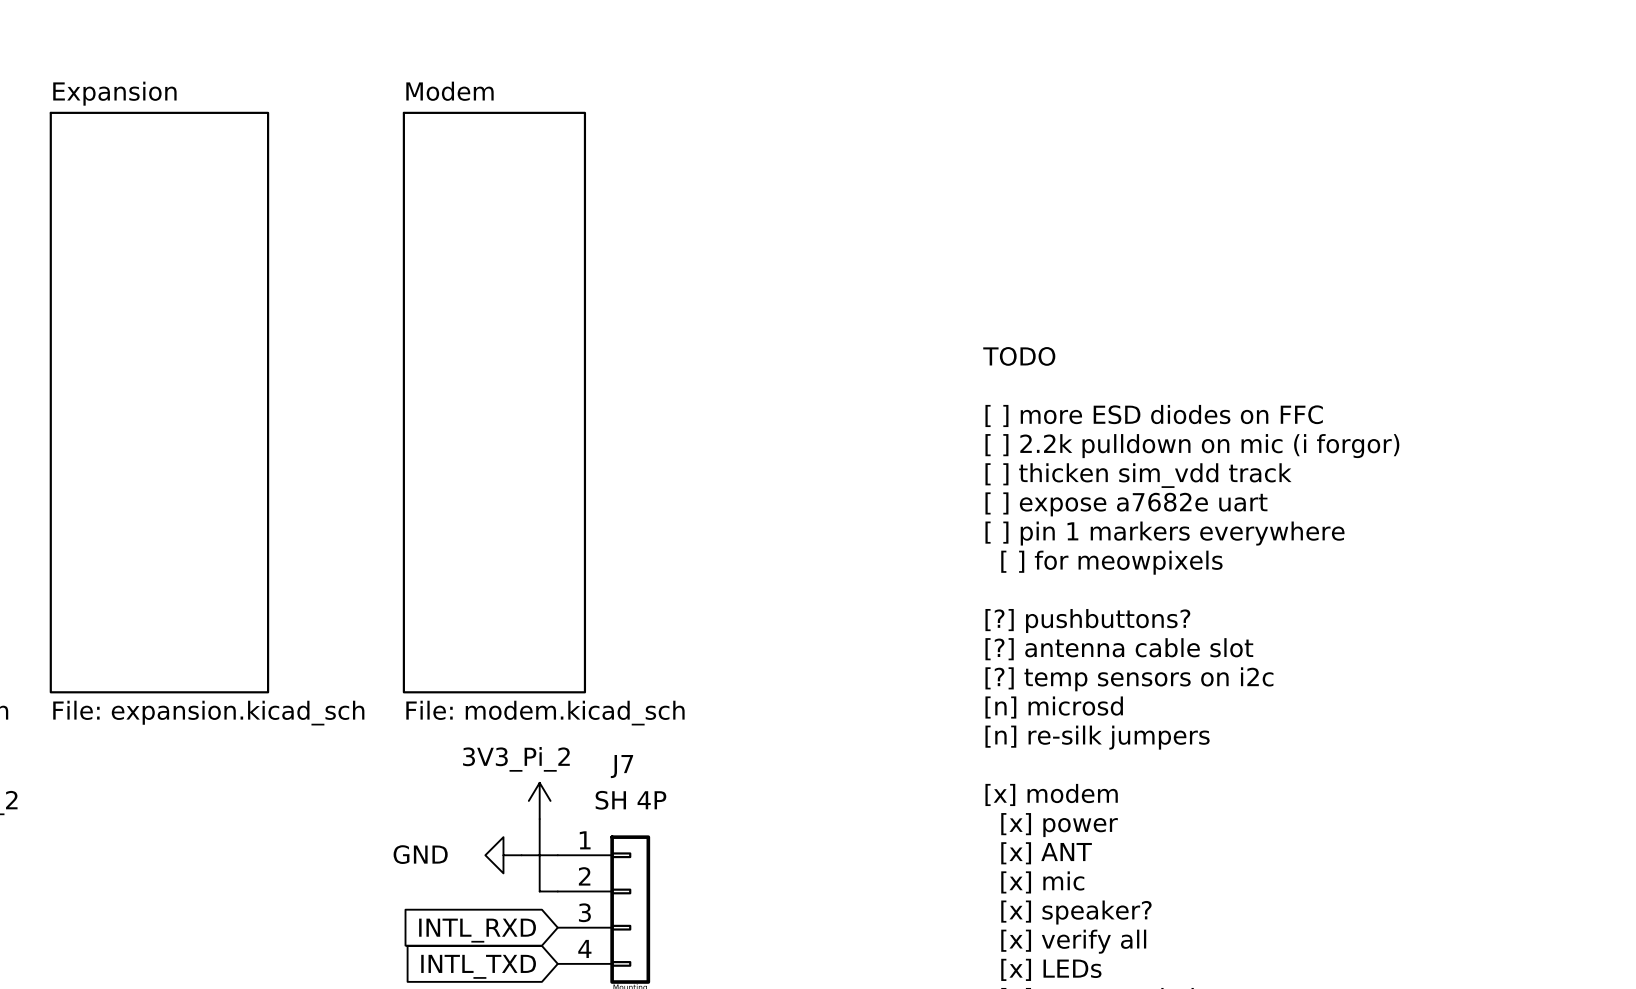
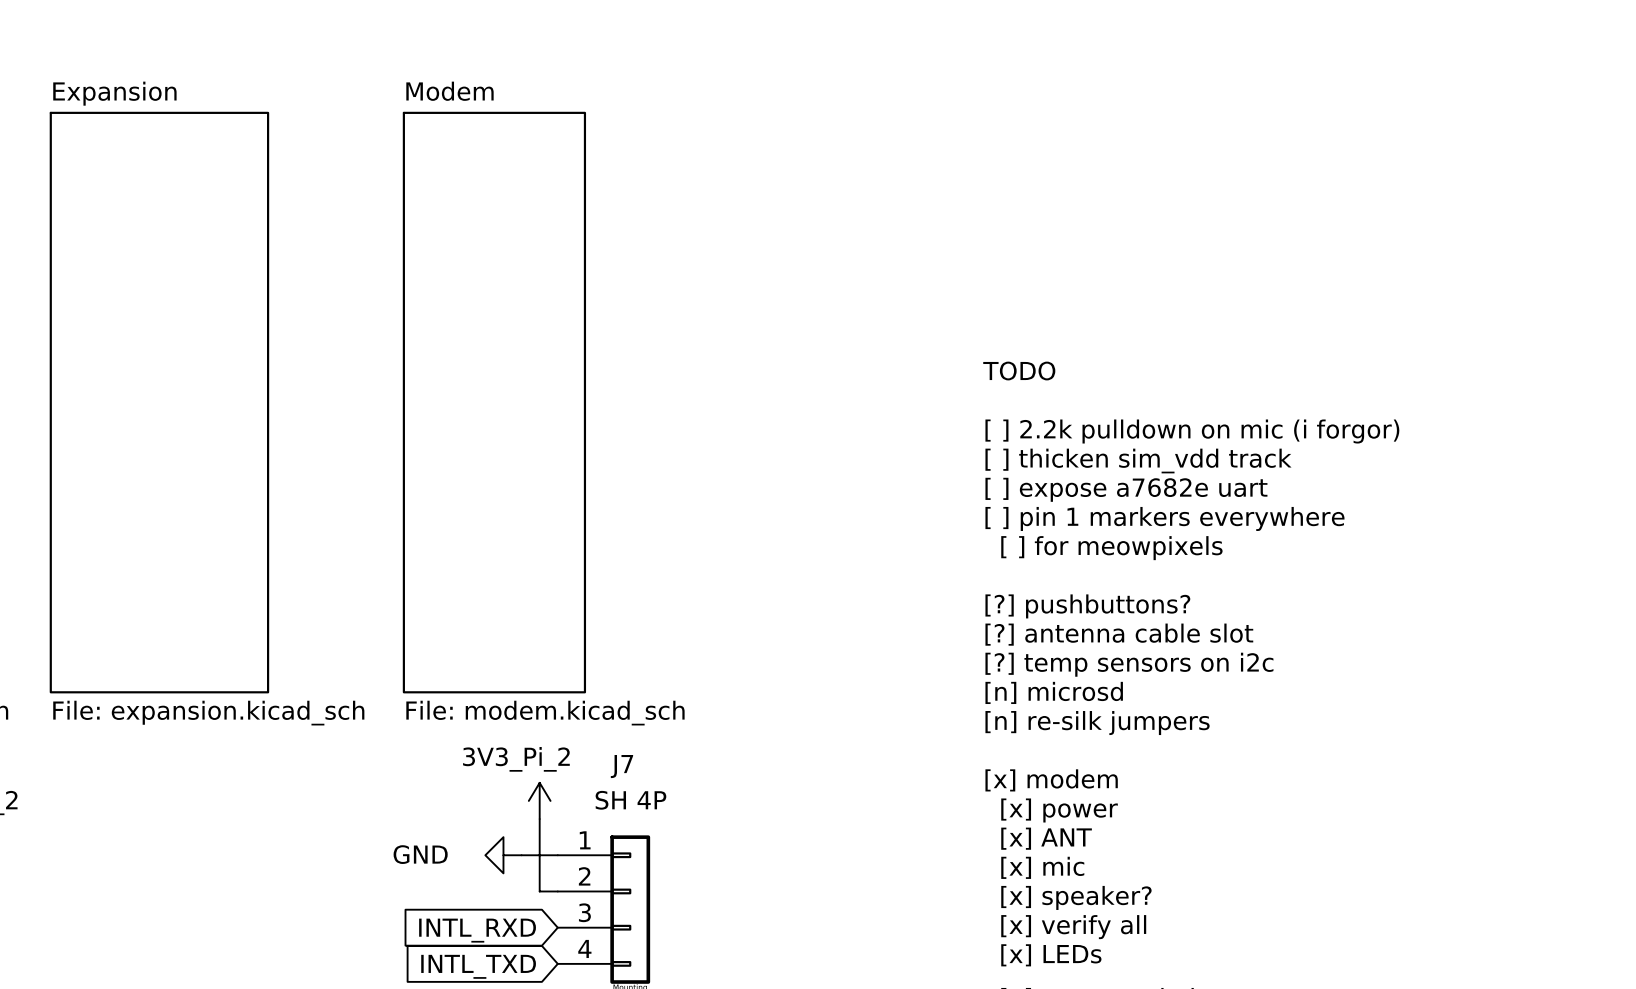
text position: TODO (1019, 356) -> TODO (1019, 371)
text: [ ] more ESD diodes on FFC (1154, 415) -> none
text position: [ ] 2.2k pulldown on mic (i forgor) (1192, 446) -> [ ] 2.2k pulldown on mic (i forgor) (1192, 431)
text position: [ ] thicken sim_vdd track (1138, 475) -> [ ] thicken sim_vdd track (1138, 461)
text position: [ ] expose a7682e uart (1126, 504) -> [ ] expose a7682e uart (1126, 489)
text position: [ ] pin 1 markers everywhere (1164, 533) -> [ ] pin 1 markers everywhere (1164, 518)
text position: [ ] for meowpixels (1111, 562) -> [ ] for meowpixels (1111, 548)
text position: [?] pushbuttons? (1087, 621) -> [?] pushbuttons? (1087, 606)
text position: [?] antenna cable slot (1119, 649) -> [?] antenna cable slot (1119, 634)
text position: [?] temp sensors on i2c (1129, 679) -> [?] temp sensors on i2c (1129, 664)
text position: [n] microsd (1054, 707) -> [n] microsd (1054, 692)
text position: [n] re-silk jumpers (1097, 737) -> [n] re-silk jumpers (1097, 723)
text position: [x] modem (1051, 794) -> [x] modem (1051, 780)
text position: [x] power (1059, 825) -> [x] power (1059, 810)
text position: [x] ANT (1046, 853) -> [x] ANT (1046, 838)
text position: [x] mic (1042, 882) -> [x] mic (1042, 867)
text position: [x] speaker? (1076, 912) -> [x] speaker? (1076, 897)
text position: [x] verify all (1073, 941) -> [x] verify all (1073, 927)
text position: [x] LEDs (1051, 969) -> [x] LEDs (1051, 955)

